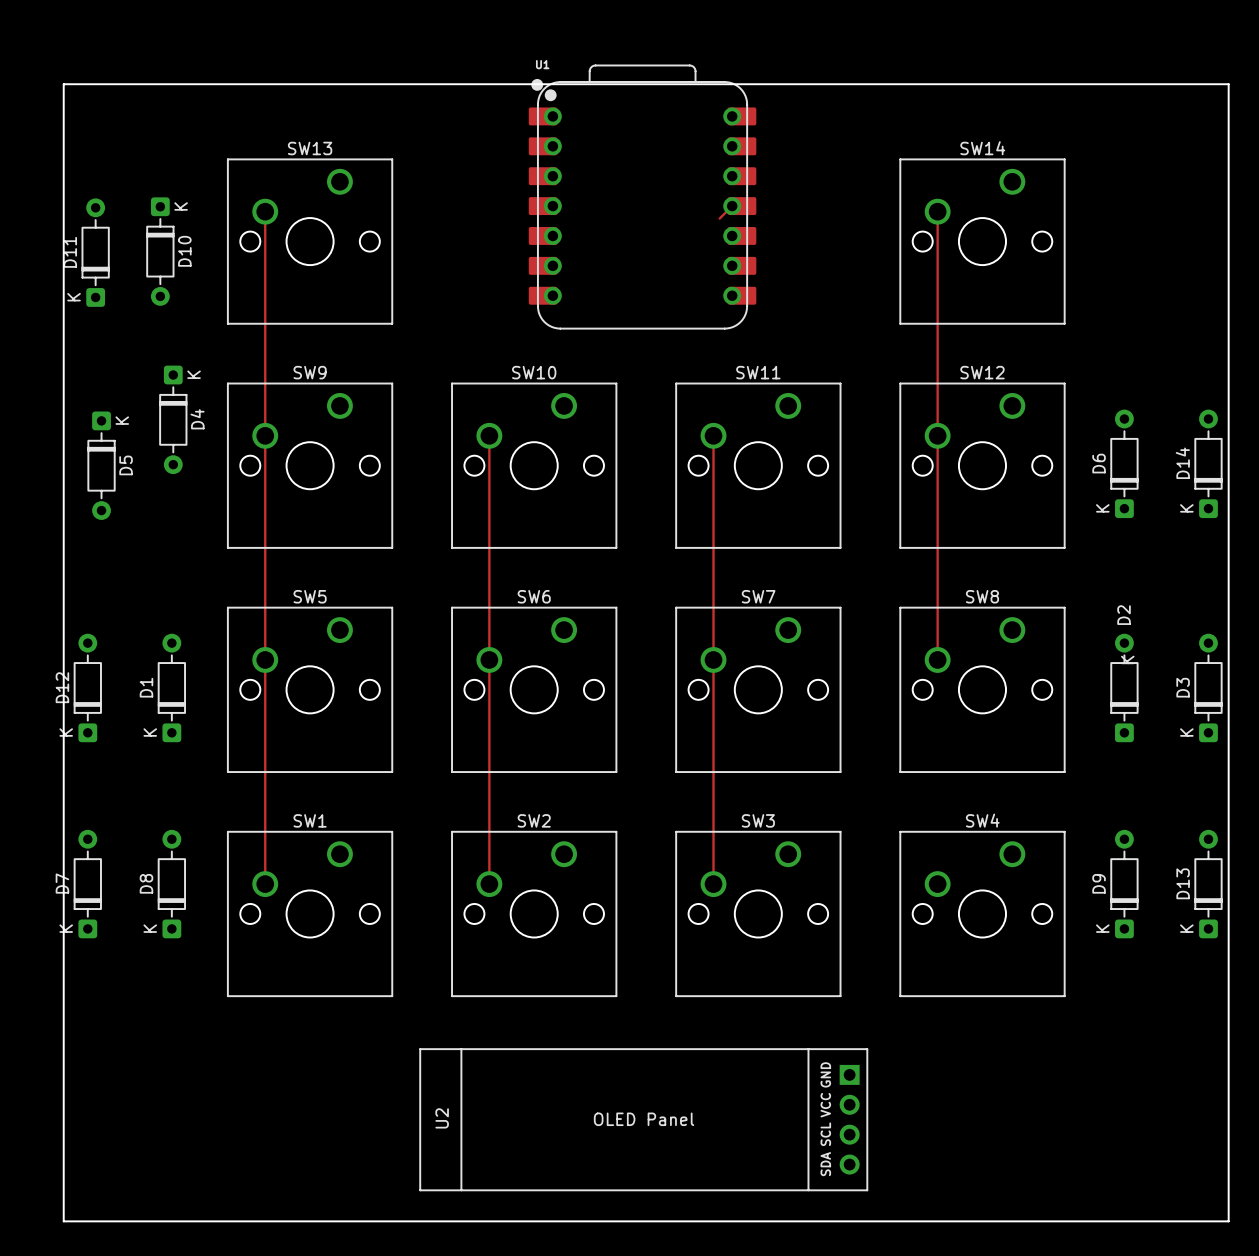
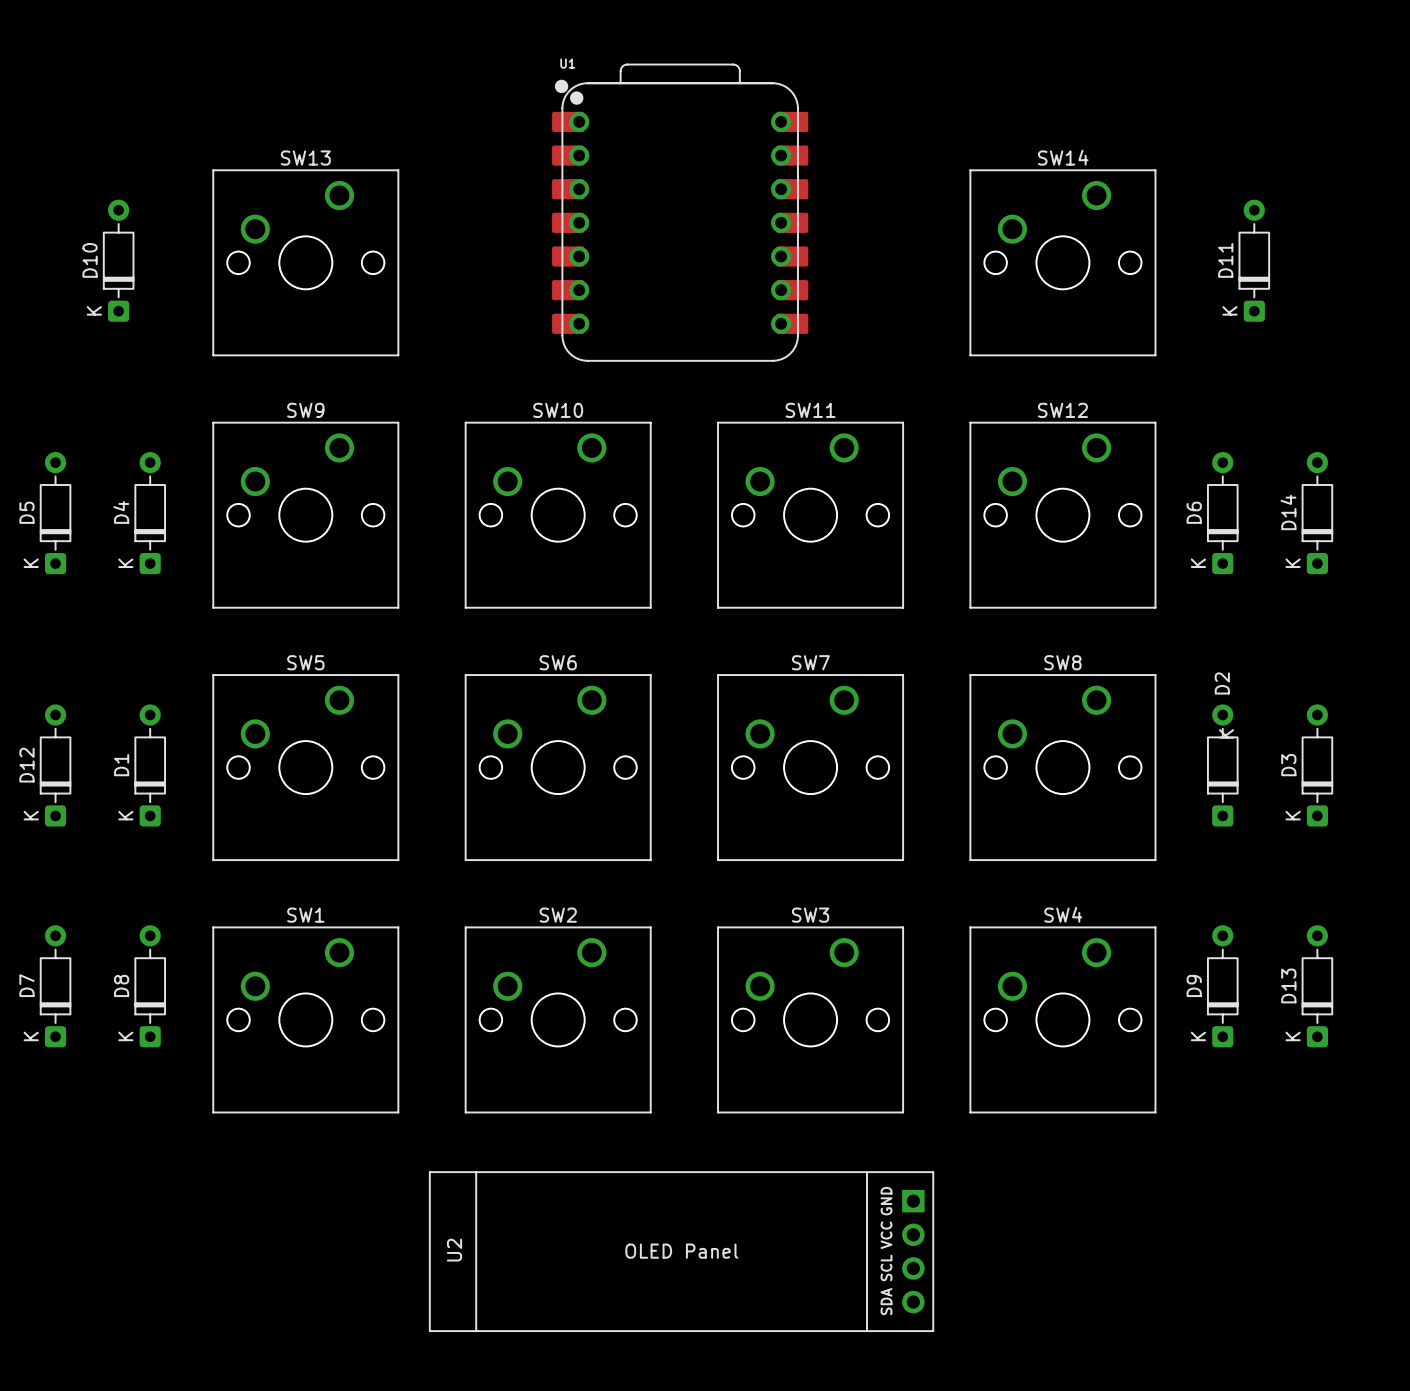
board edge: (63, 84) (1228, 84) (1228, 1221) (63, 1221) (63, 84) -> none
track: (732, 206) (719, 218) -> none
track: (265, 211) (265, 884) -> none
track: (932, 211) (937, 211) (937, 659) -> none
D10 rotation: 0° (160, 251) -> 180° (118, 260)
D11 position: (95, 252) -> (1254, 260)
D4 rotation: 0° (173, 419) -> 180° (150, 513)
track: (489, 435) (489, 884) -> none
track: (713, 435) (713, 884) -> none
D5 rotation: 0° (101, 465) -> 180° (55, 513)

